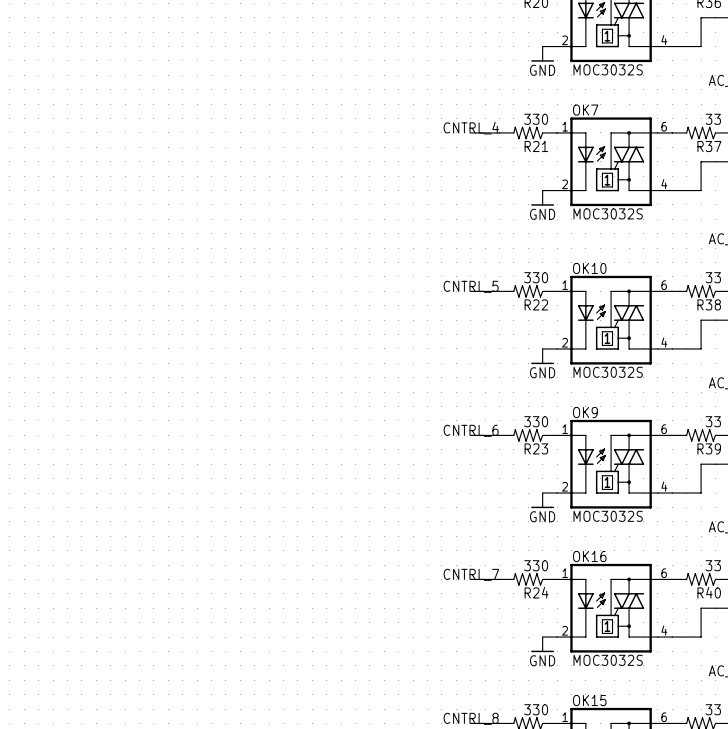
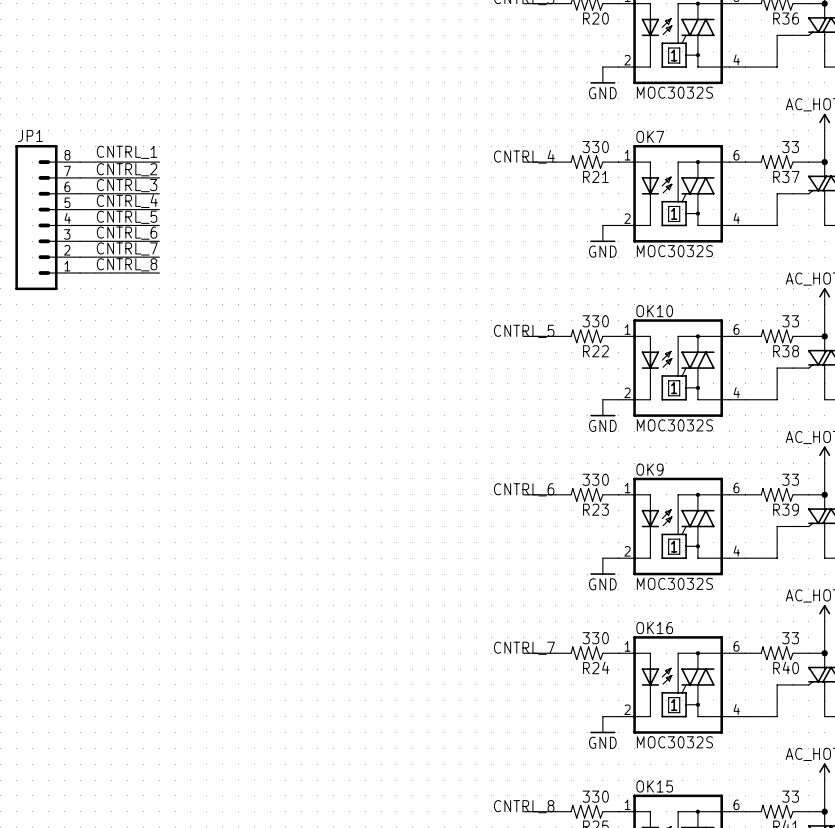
label: none -> CNTRL_1 (127, 152)
wire: none -> (80, 162) (159, 162)
label: none -> CNTRL_2 (127, 169)
wire: none -> (80, 177) (159, 177)
label: none -> CNTRL_3 (127, 185)
wire: none -> (80, 193) (159, 193)
label: none -> CNTRL_4 (127, 201)
wire: none -> (80, 209) (159, 209)
JP1: none -> (47, 217)
label: none -> CNTRL_5 (127, 217)
wire: none -> (80, 225) (159, 225)
label: none -> CNTRL_6 (127, 233)
wire: none -> (80, 241) (159, 241)
label: none -> CNTRL_7 (127, 248)
wire: none -> (80, 257) (159, 257)
label: none -> CNTRL_8 (127, 264)
wire: none -> (80, 273) (159, 273)

